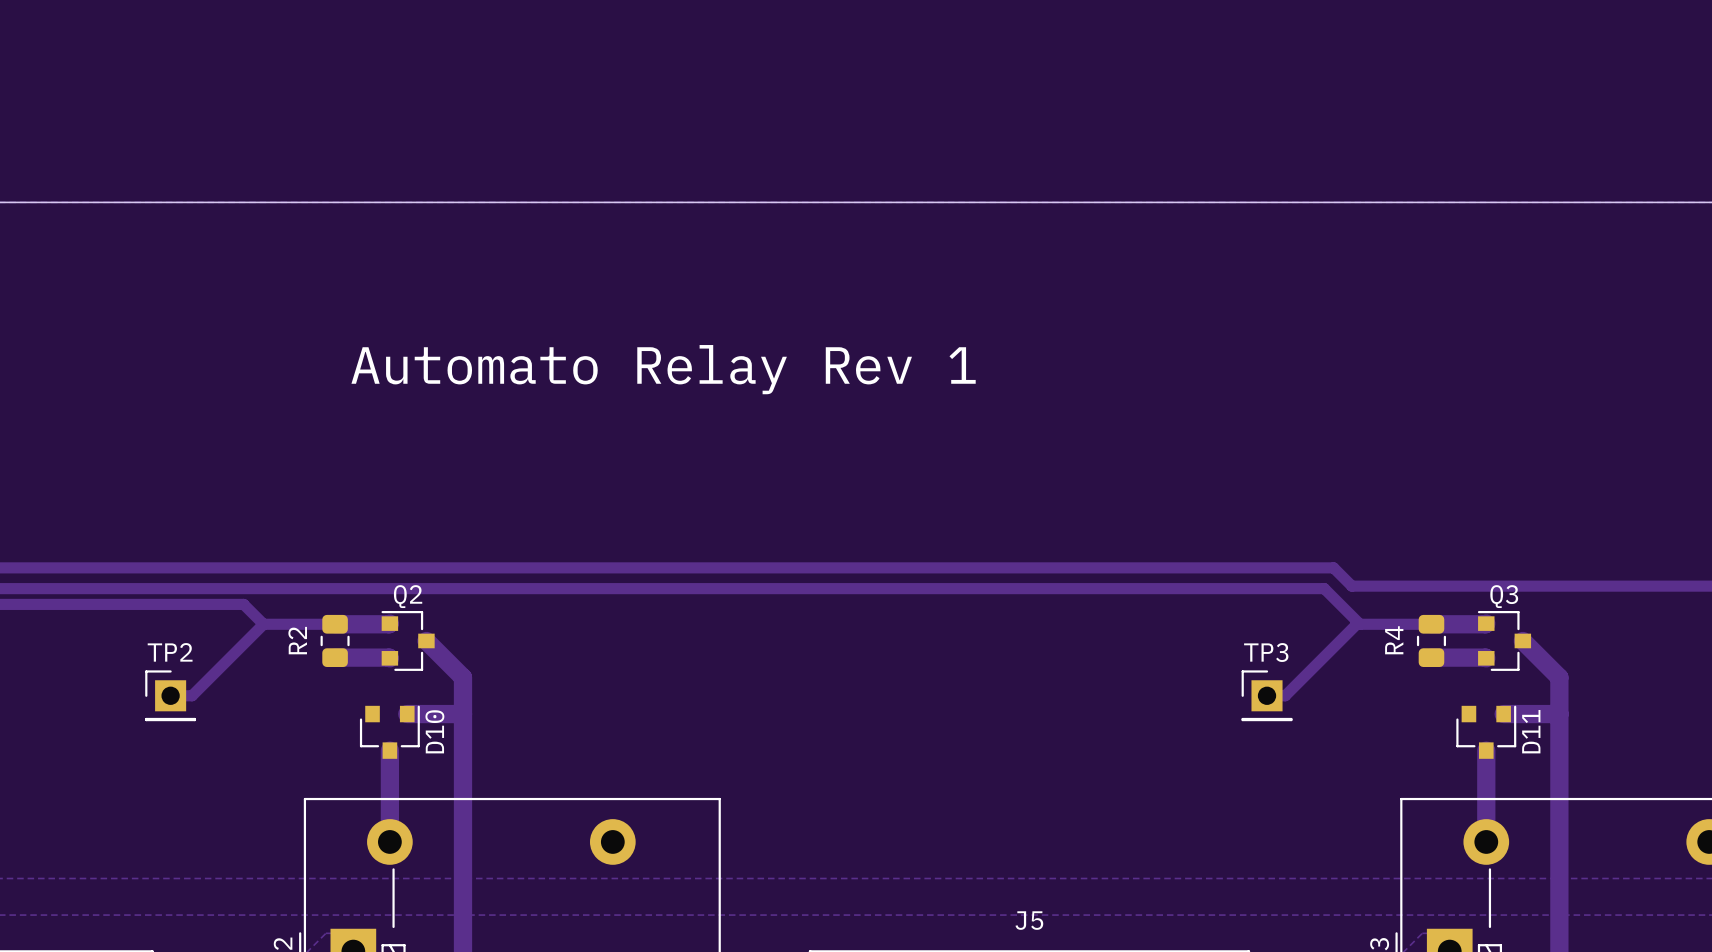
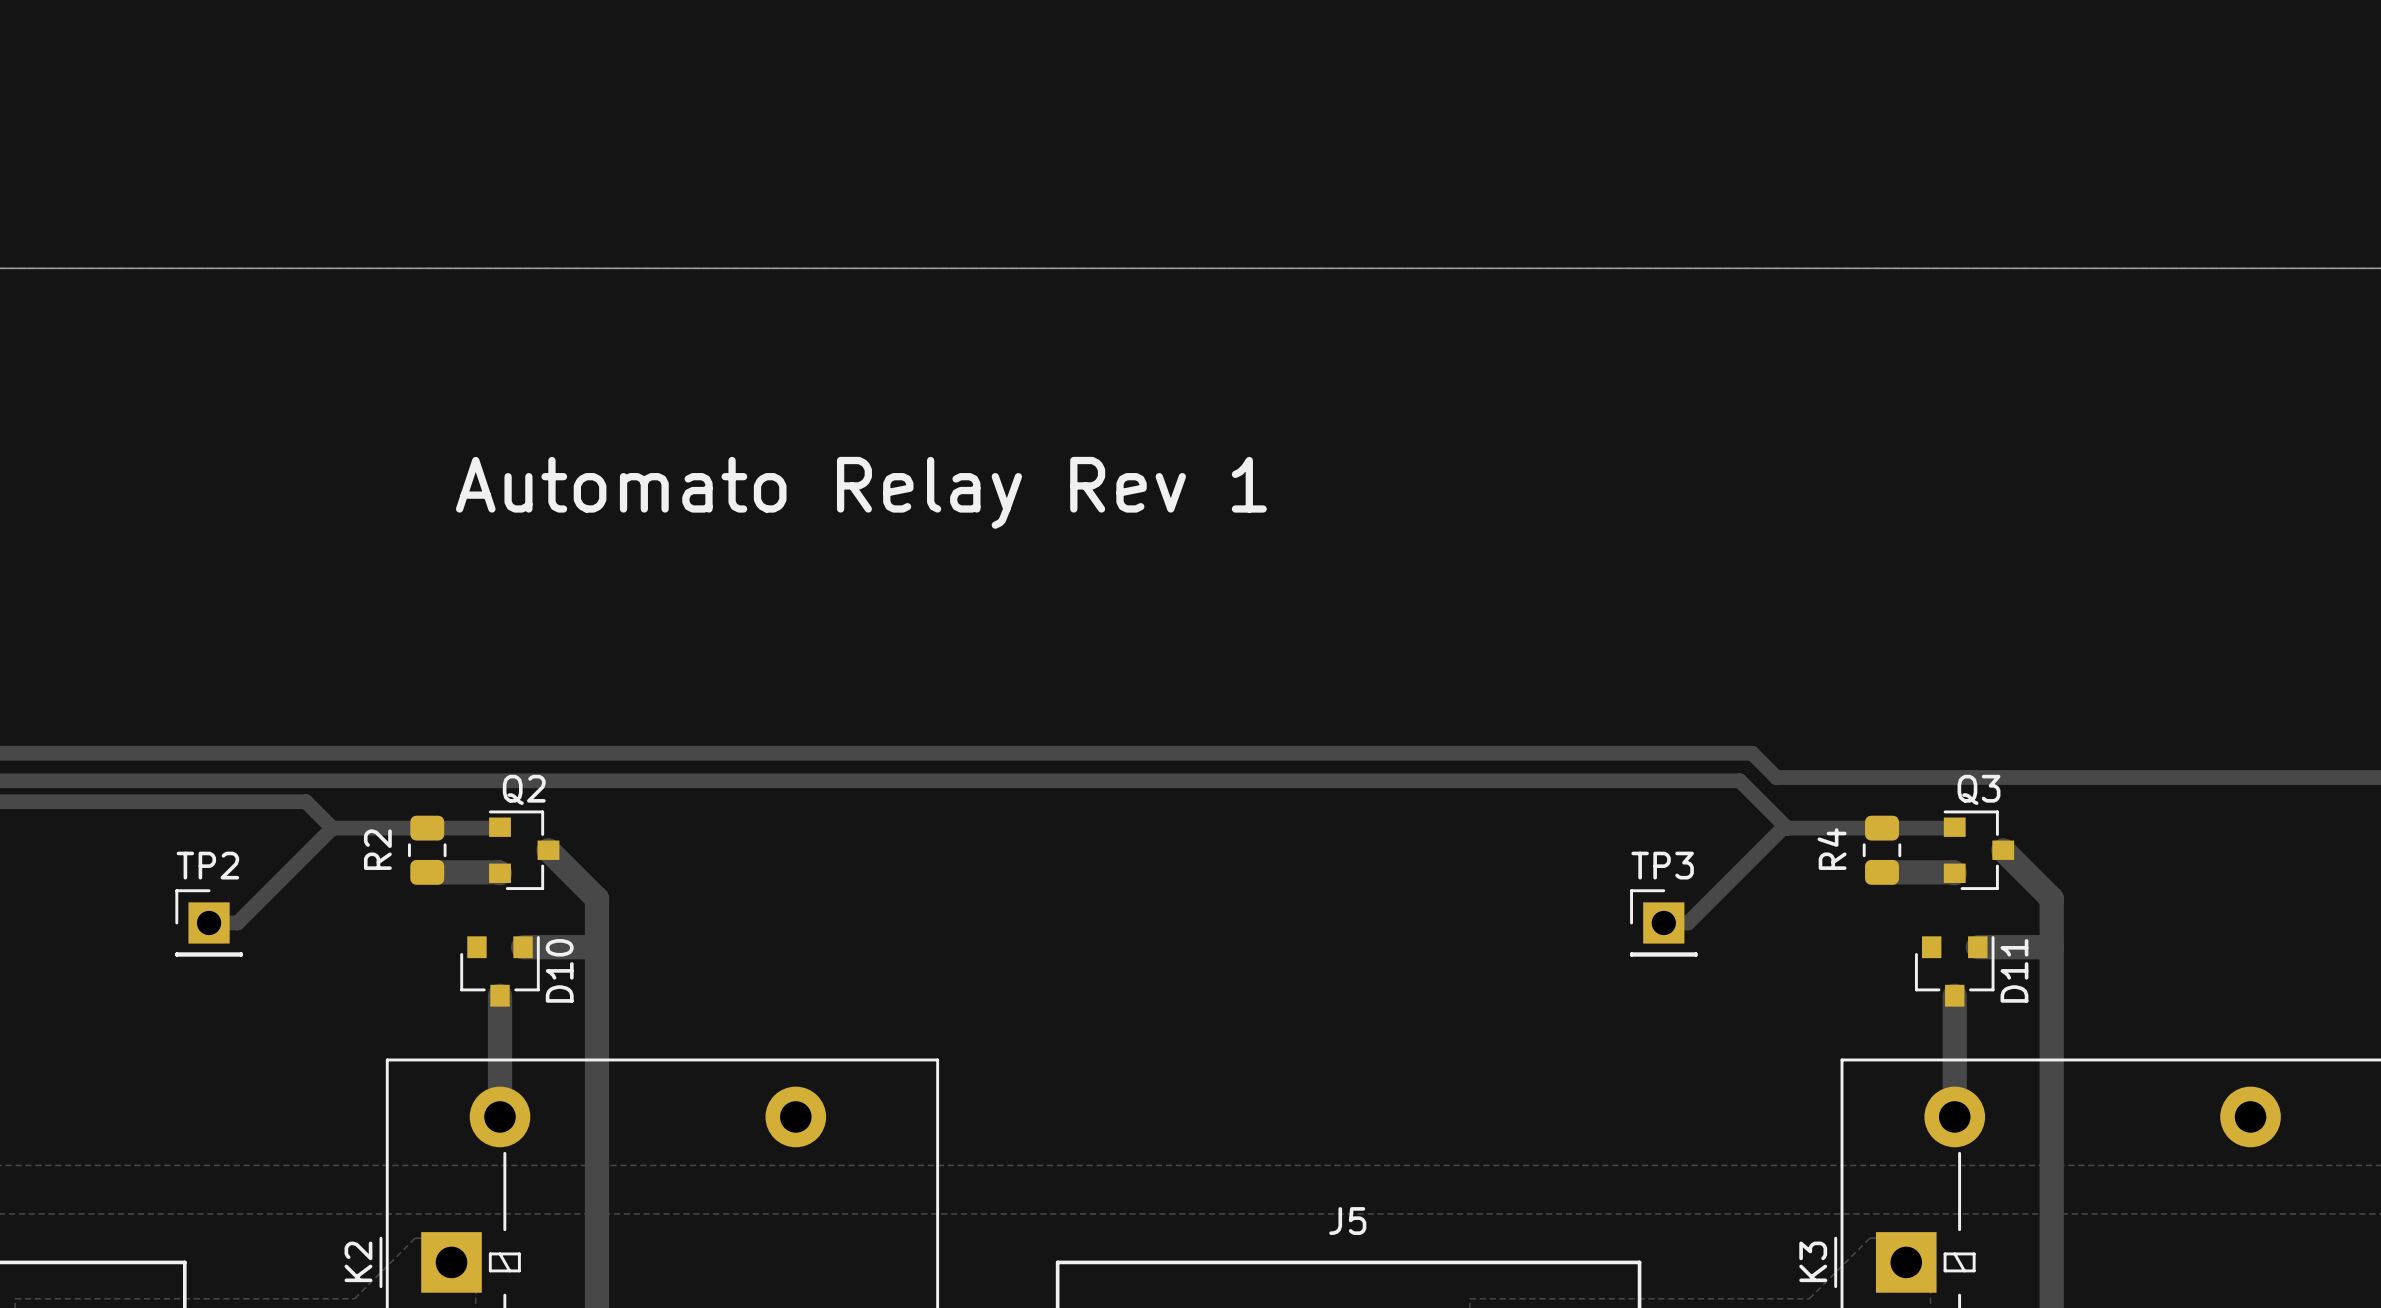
track width: thick (389, 623) (335, 624) -> thin (500, 827) (427, 828)
track width: thick (1486, 623) (1431, 624) -> thin (1954, 827) (1882, 828)

